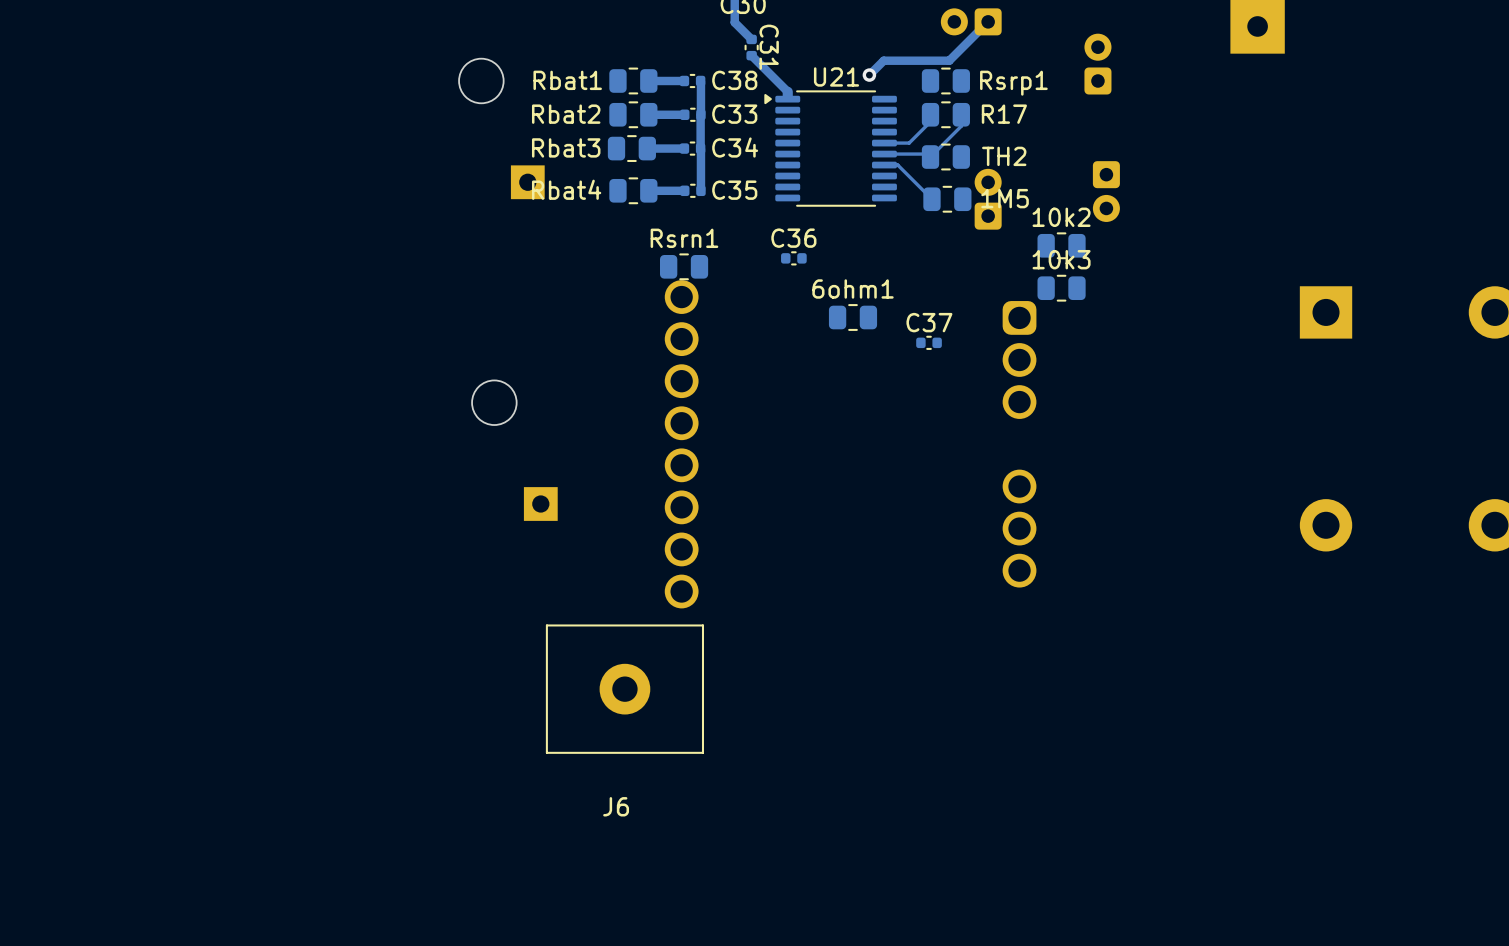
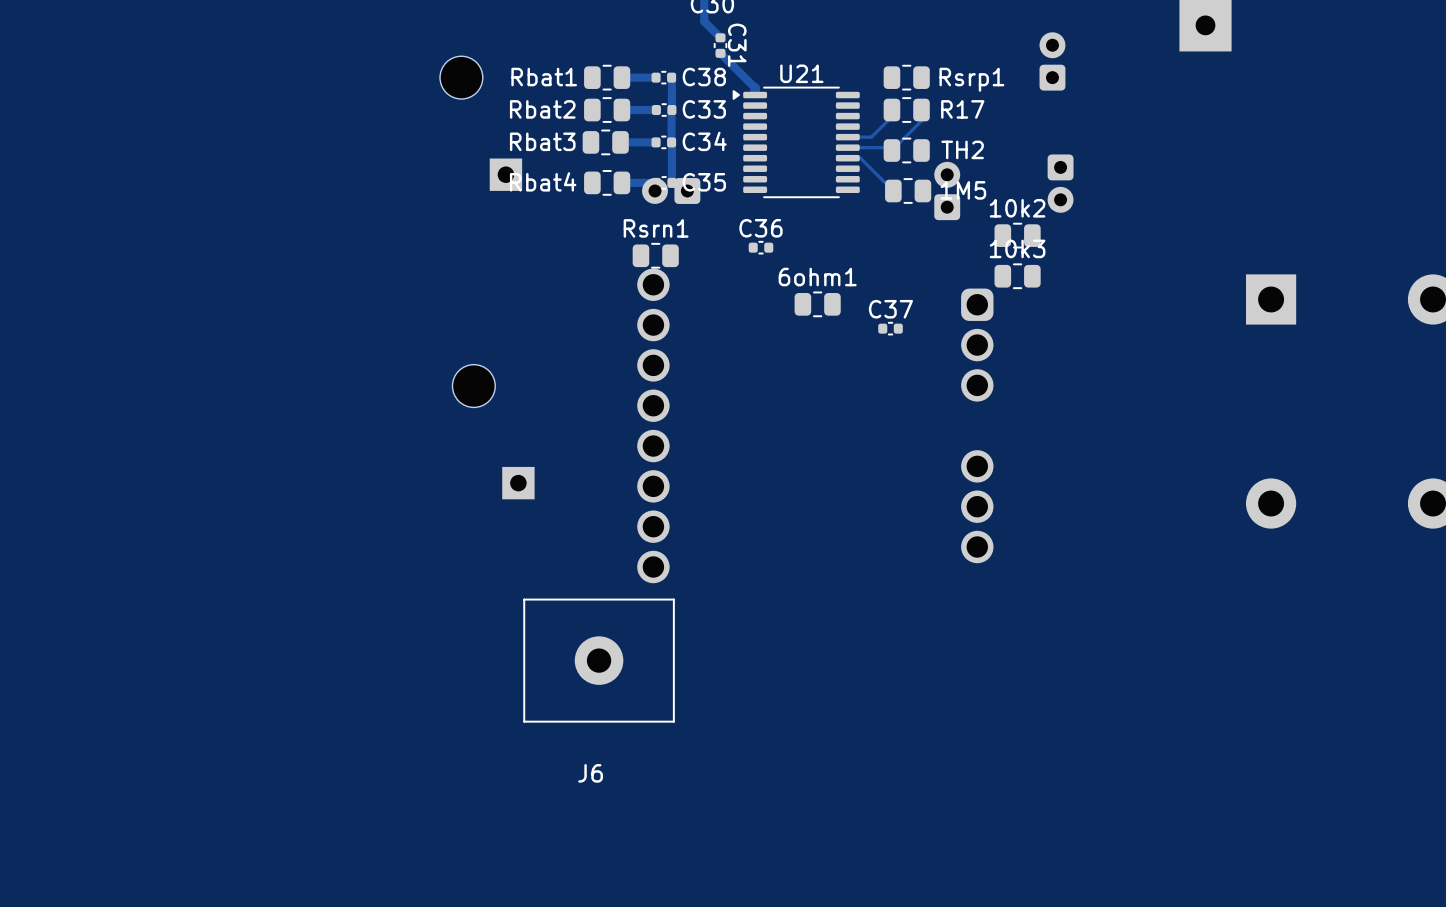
part position: (971, 21) -> (671, 190)
track: (988, 21) (949, 60) (883, 60) (869, 75) -> none
via: (869, 75) -> none

